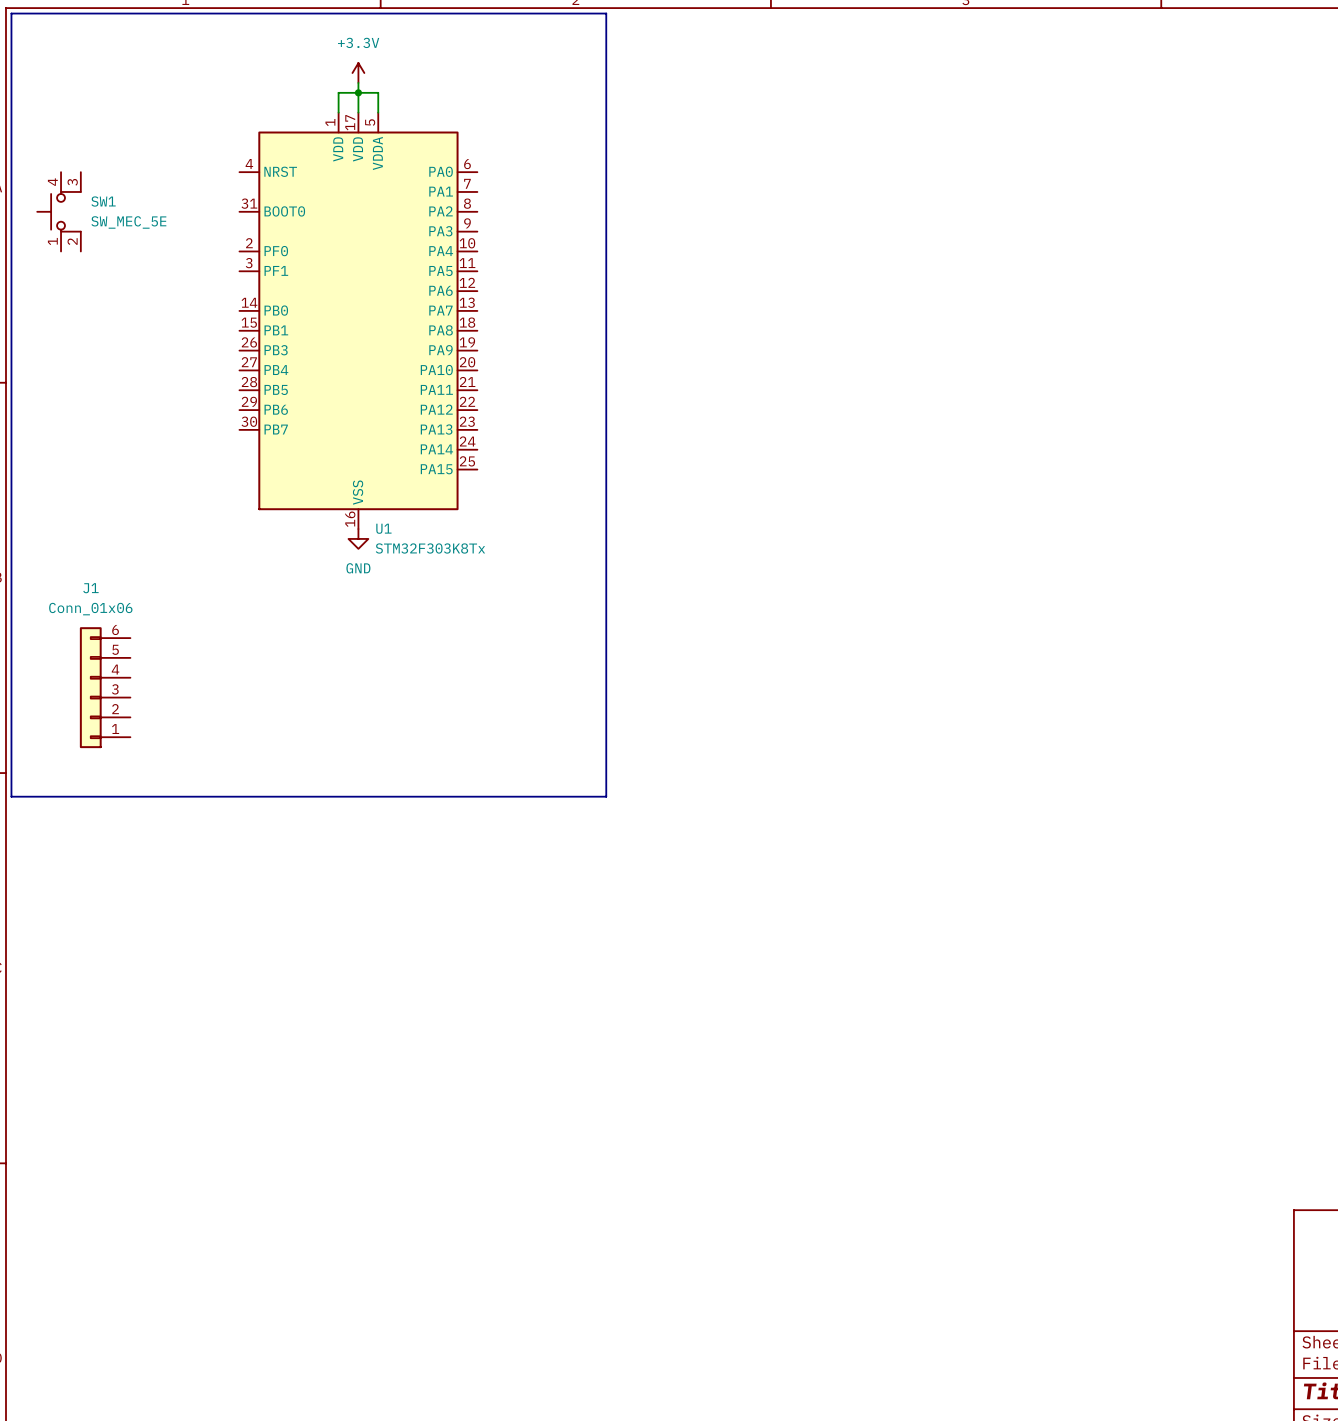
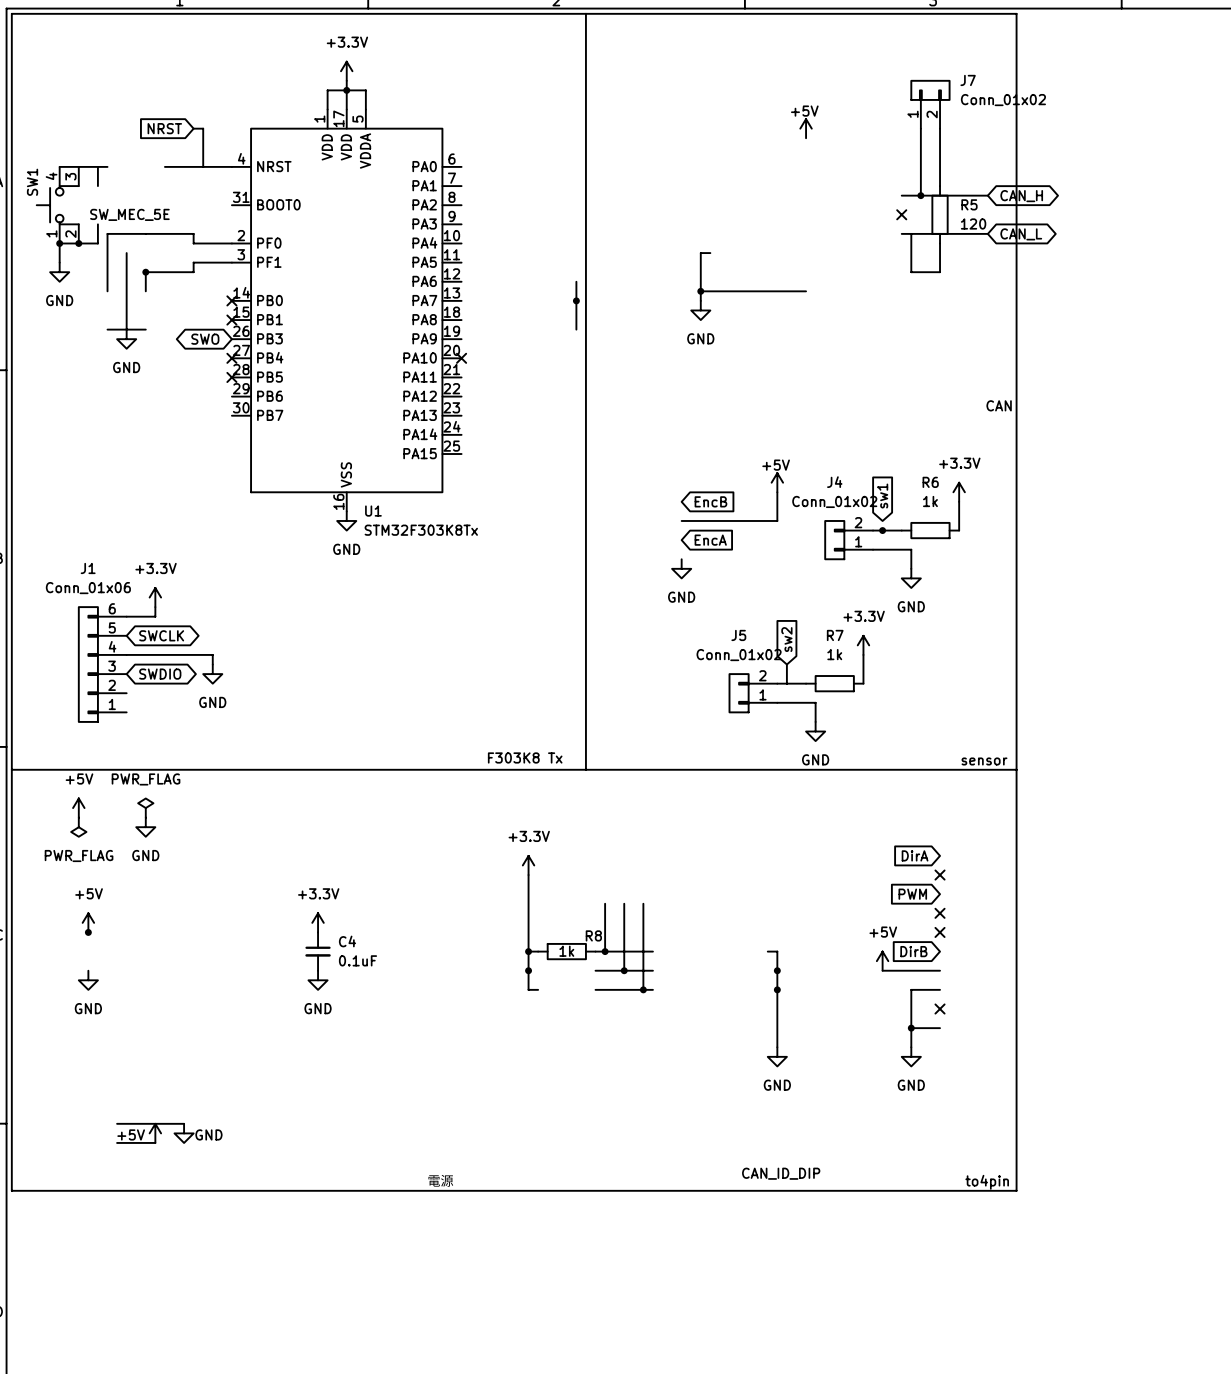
line: none -> (585, 13) (1016, 13) (1016, 1190) (11, 1190) (11, 769)
J7: none -> Conn_01x02 (930, 104)
global label: none -> NRST (164, 128)
wire: none -> (193, 128) (203, 128) (203, 166)
power symbol: none -> +5V (806, 128)
wire: none -> (920, 128) (920, 195)
wire: none -> (940, 128) (940, 186)
wire: none -> (59, 166) (107, 166)
wire: none -> (97, 166) (97, 186)
wire: none -> (164, 166) (231, 166)
SW1 name rotation: 0° (103, 201) -> 90° counterclockwise (32, 182)
SW1 name position: SW1 (103, 201) -> SW1 (32, 182)
wire: none -> (901, 195) (987, 195)
junction: none -> (920, 195)
global label: none -> CAN_H (1021, 196)
no-connect mark: none -> (901, 214)
R5: none -> 120 (940, 214)
wire: none -> (97, 224) (97, 243) (59, 243) (59, 262)
wire: none -> (901, 233) (987, 233)
wire: none -> (911, 233) (911, 272) (940, 272) (940, 243)
global label: none -> CAN_L (1021, 234)
junction: none -> (59, 243)
junction: none -> (78, 243)
wire: none -> (231, 243) (193, 243) (193, 233) (107, 233) (107, 291)
wire: none -> (126, 253) (126, 329)
wire: none -> (710, 253) (700, 253) (700, 300)
wire: none -> (231, 262) (193, 262) (193, 272) (145, 272) (145, 291)
power symbol: none -> GND (59, 272)
junction: none -> (145, 272)
wire: none -> (576, 281) (576, 329)
wire: none -> (700, 291) (806, 291)
junction: none -> (700, 291)
no-connect mark: none -> (231, 300)
junction: none -> (576, 300)
power symbol: none -> GND (700, 310)
no-connect mark: none -> (231, 320)
wire: none -> (107, 329) (145, 329)
power symbol: none -> GND (126, 339)
global label: none -> SWO (205, 339)
no-connect mark: none -> (231, 358)
no-connect mark: none -> (461, 358)
no-connect mark: none -> (231, 377)
text: none -> CAN (999, 405)
power symbol: none -> +5V (777, 482)
wire: none -> (777, 492) (777, 520) (681, 520)
power symbol: none -> +3.3V (959, 492)
global label: none -> sw1 (882, 496)
global label: none -> EncB (710, 501)
wire: none -> (959, 501) (959, 530)
wire: none -> (873, 530) (901, 530)
junction: none -> (882, 530)
R6: none -> 1k (930, 530)
global label: none -> EncA (710, 540)
J4: none -> Conn_01x02 (848, 540)
wire: none -> (873, 549) (911, 549) (911, 568)
power symbol: none -> GND (681, 568)
power symbol: none -> GND (911, 578)
power symbol: none -> +3.3V (155, 597)
wire: none -> (155, 607) (155, 616) (126, 616)
global label: none -> SWCLK (161, 635)
global label: none -> sw2 (786, 639)
power symbol: none -> +3.3V (863, 645)
wire: none -> (126, 654) (212, 654) (212, 664)
wire: none -> (863, 654) (863, 683)
wire: none -> (786, 664) (786, 683)
global label: none -> SWDIO (160, 674)
power symbol: none -> GND (212, 674)
wire: none -> (777, 683) (806, 683)
R7: none -> 1k (834, 683)
J5: none -> Conn_01x02 (752, 693)
wire: none -> (777, 702) (815, 702) (815, 721)
power symbol: none -> GND (815, 731)
text: none -> F303K8 Tx (525, 757)
text: none -> sensor (984, 761)
line: none -> (585, 769) (1016, 769)
power symbol: none -> +5V (78, 808)
power symbol: none -> PWR_FLAG (145, 808)
power symbol: none -> PWR_FLAG (78, 827)
power symbol: none -> GND (145, 827)
global label: none -> DirA (915, 855)
power symbol: none -> +3.3V (528, 865)
wire: none -> (528, 875) (528, 989) (538, 989)
no-connect mark: none -> (940, 875)
global label: none -> PWM (912, 894)
wire: none -> (605, 903) (605, 951)
wire: none -> (624, 903) (624, 970)
wire: none -> (643, 903) (643, 989)
no-connect mark: none -> (940, 913)
power symbol: none -> +5V (88, 922)
power symbol: none -> +3.3V (318, 922)
junction: none -> (88, 932)
no-connect mark: none -> (940, 932)
global label: none -> DirB (913, 951)
C4: none -> 0.1uF (318, 951)
wire: none -> (528, 951) (538, 951)
junction: none -> (528, 951)
R8: none -> 1k (566, 951)
wire: none -> (595, 951) (652, 951)
junction: none -> (605, 951)
wire: none -> (767, 951) (777, 951) (777, 1047)
power symbol: none -> +5V (882, 961)
junction: none -> (528, 970)
wire: none -> (595, 970) (652, 970)
junction: none -> (624, 970)
junction: none -> (777, 970)
wire: none -> (882, 970) (940, 970)
power symbol: none -> GND (88, 980)
power symbol: none -> GND (318, 980)
wire: none -> (595, 989) (652, 989)
junction: none -> (643, 989)
junction: none -> (777, 989)
wire: none -> (940, 989) (911, 989) (911, 1047)
no-connect mark: none -> (940, 1009)
wire: none -> (911, 1028) (940, 1028)
junction: none -> (911, 1028)
power symbol: none -> GND (777, 1056)
power symbol: none -> GND (911, 1056)
wire: none -> (117, 1123) (184, 1123)
power symbol: none -> +5V (155, 1133)
power symbol: none -> GND (184, 1133)
wire: none -> (117, 1142) (155, 1142)
text: none -> CAN_ID_DIP (781, 1173)
text: none -> 電源 (440, 1180)
text: none -> to4pin (987, 1182)

